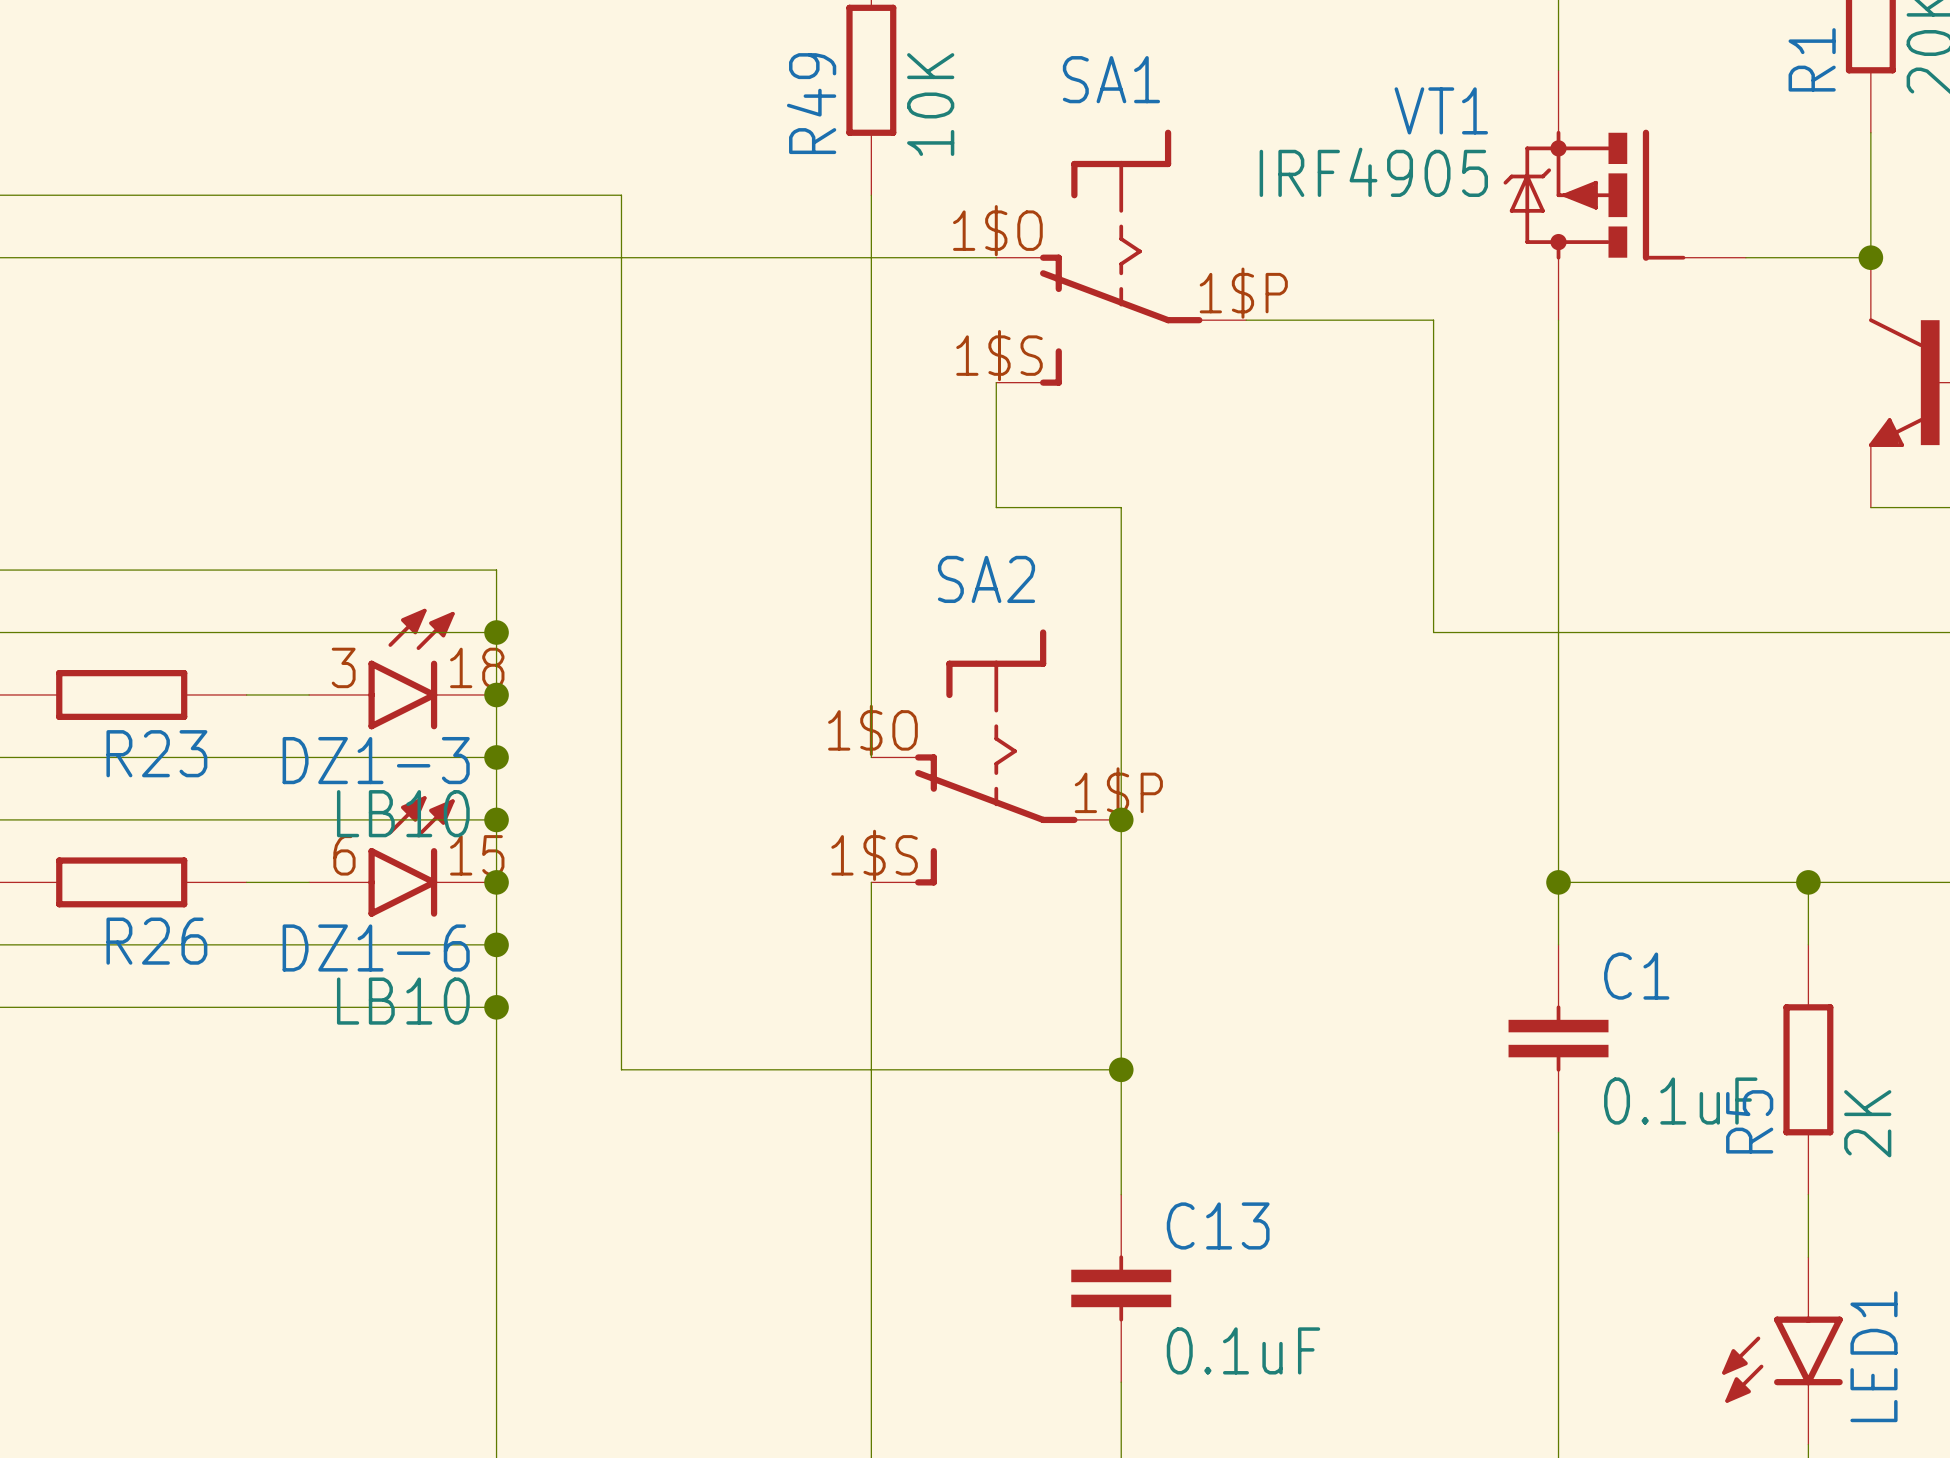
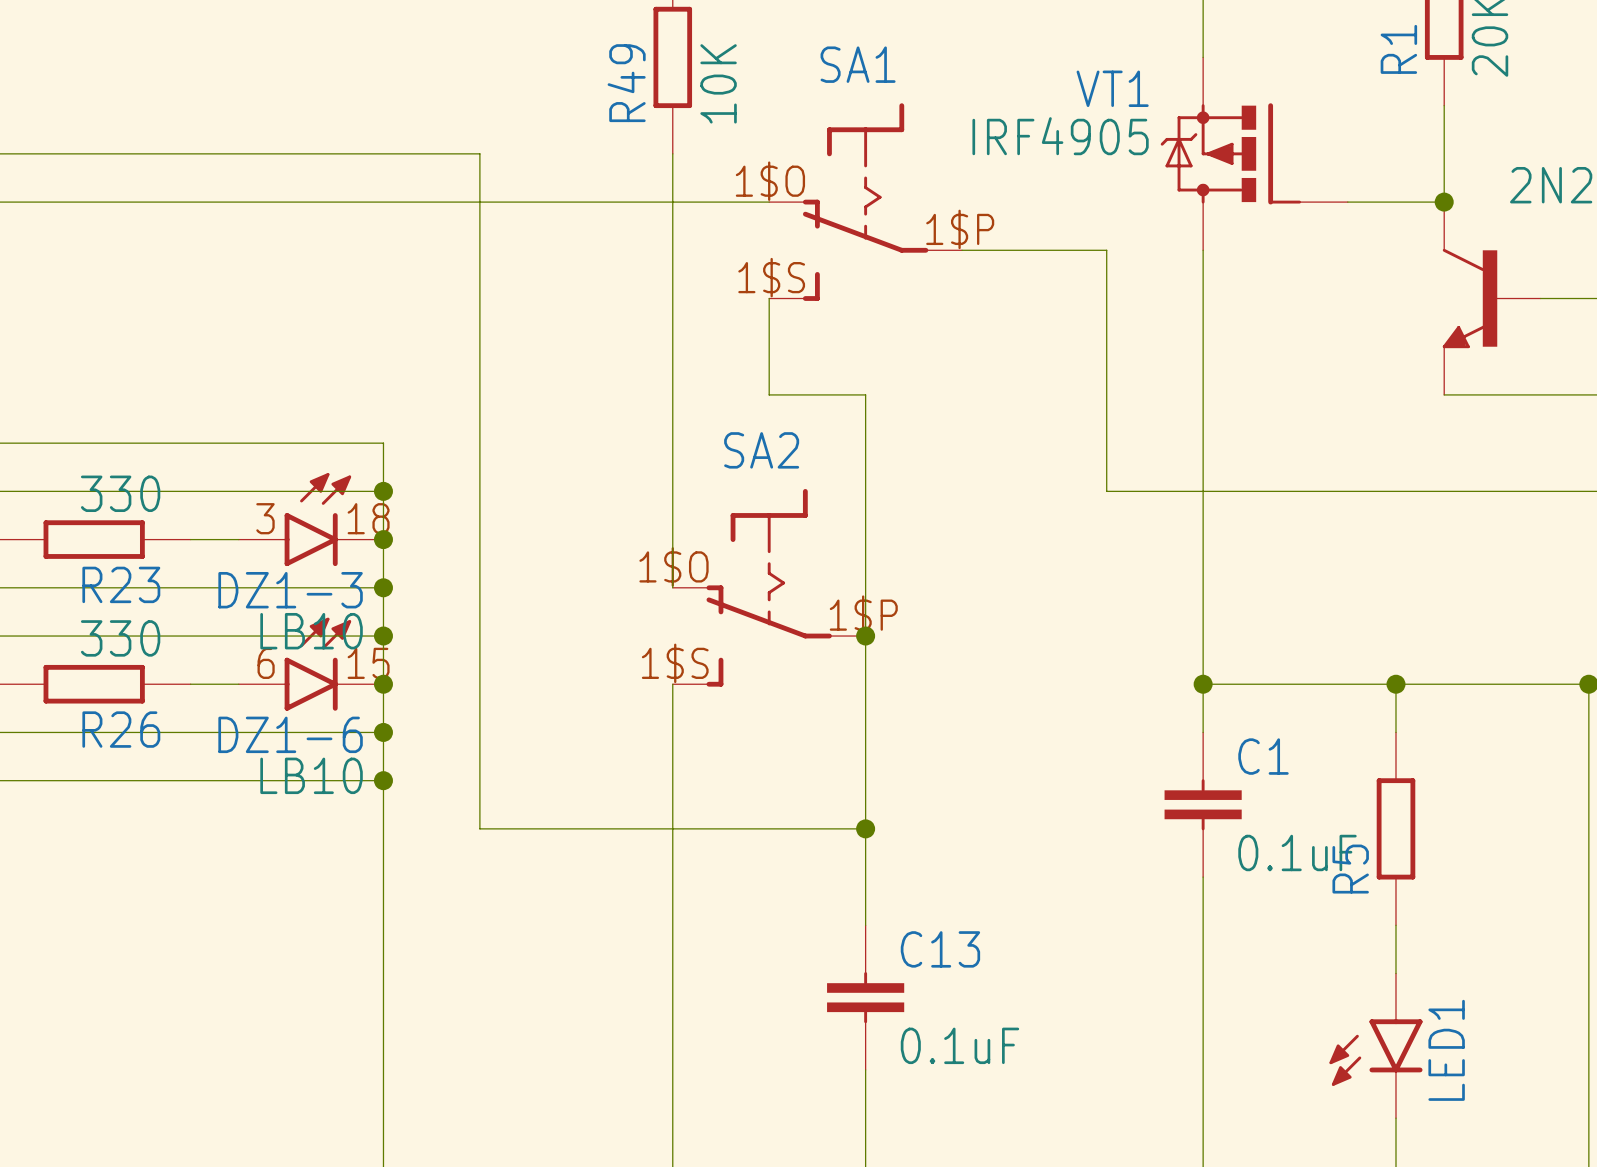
R23 value: none -> 330 (120, 493)
R26 value: none -> 330 (120, 638)
R5 value: 2K (1867, 1123) -> none

